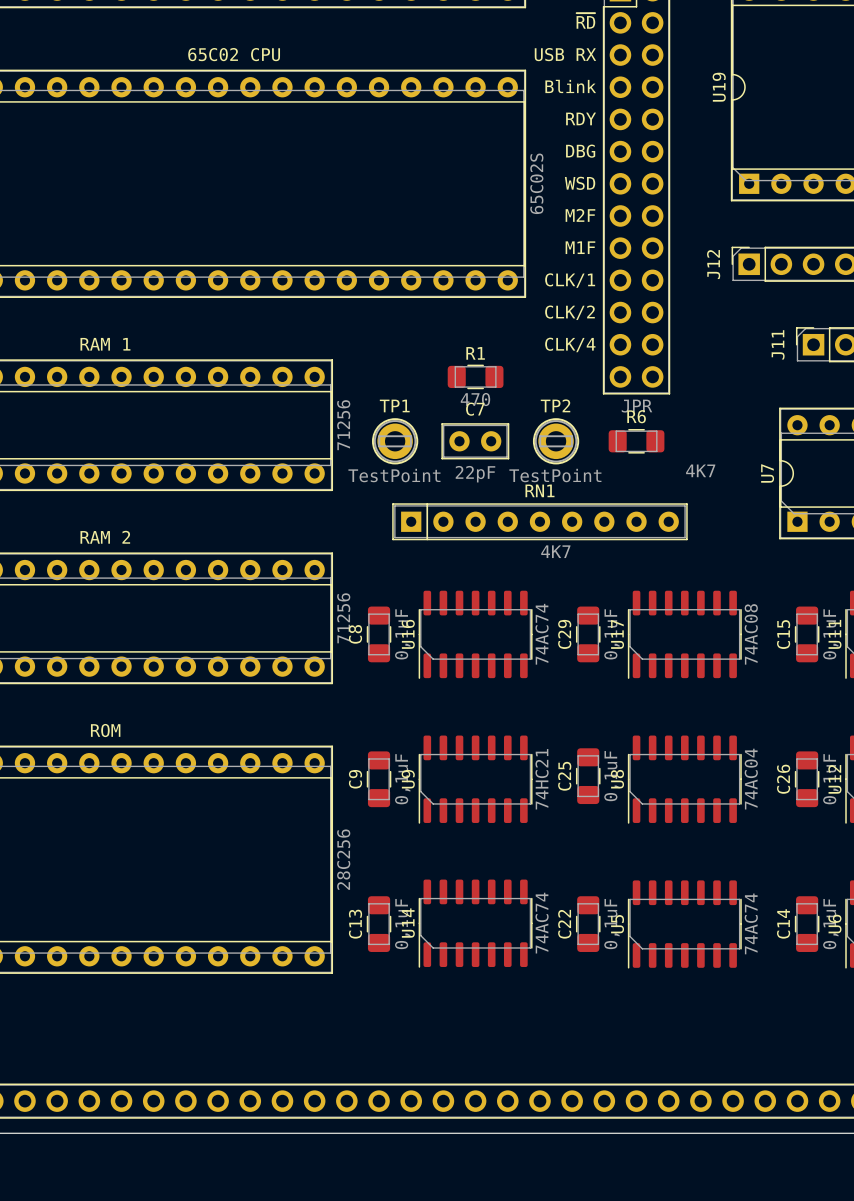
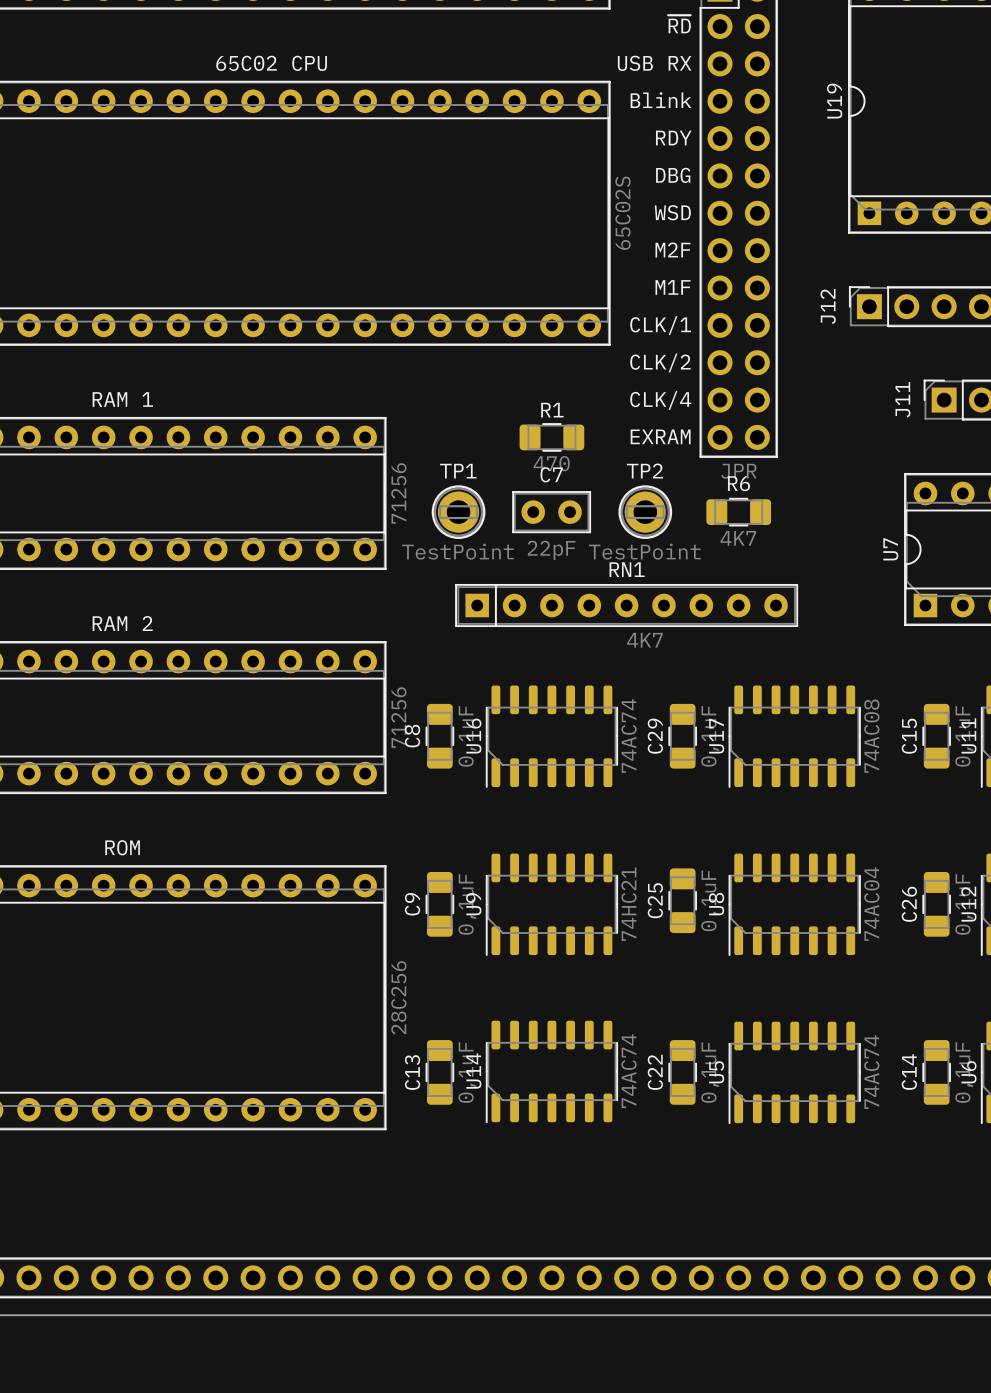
text: none -> EXRAM (660, 436)
R6 value position: 4K7 (700, 470) -> 4K7 (738, 538)

